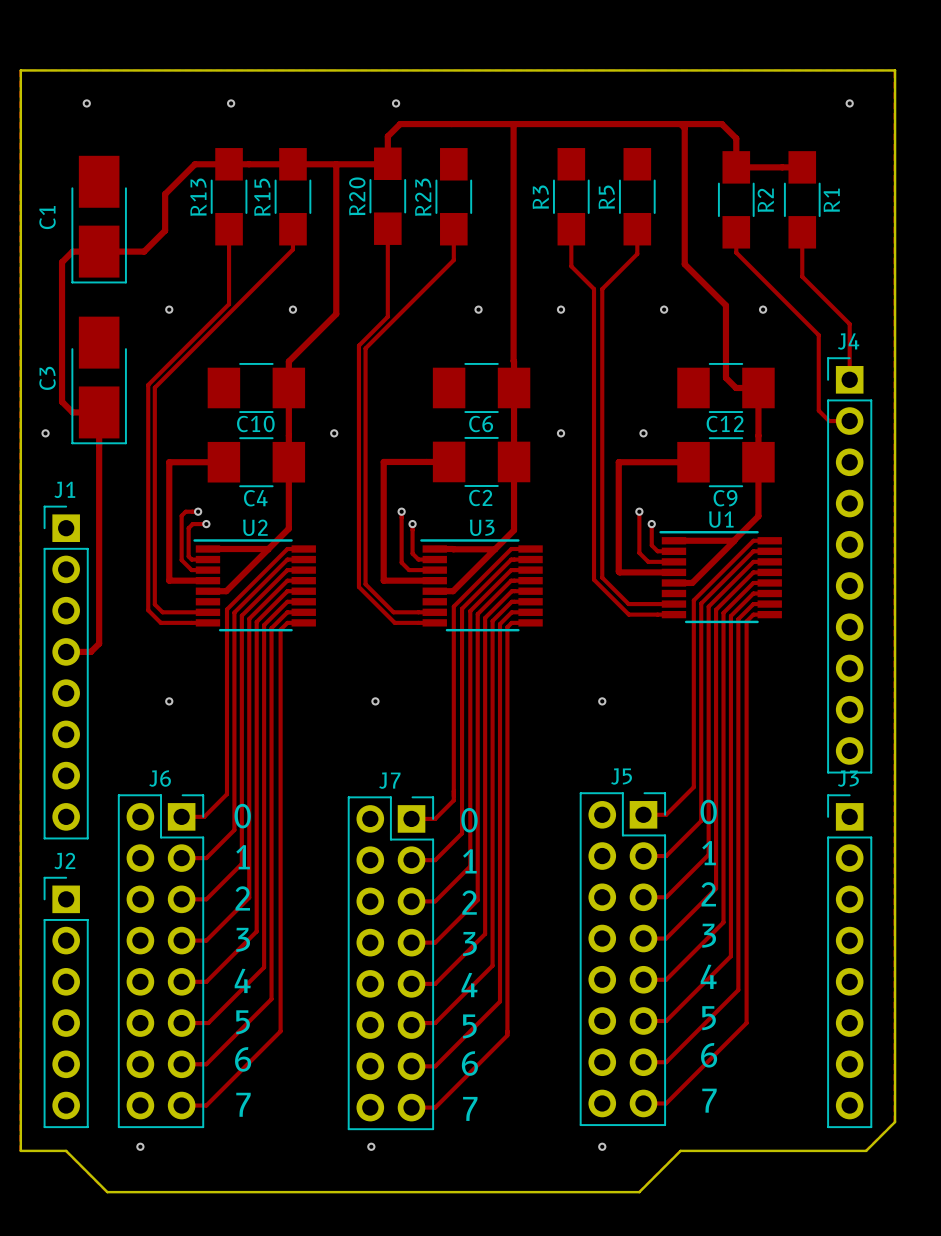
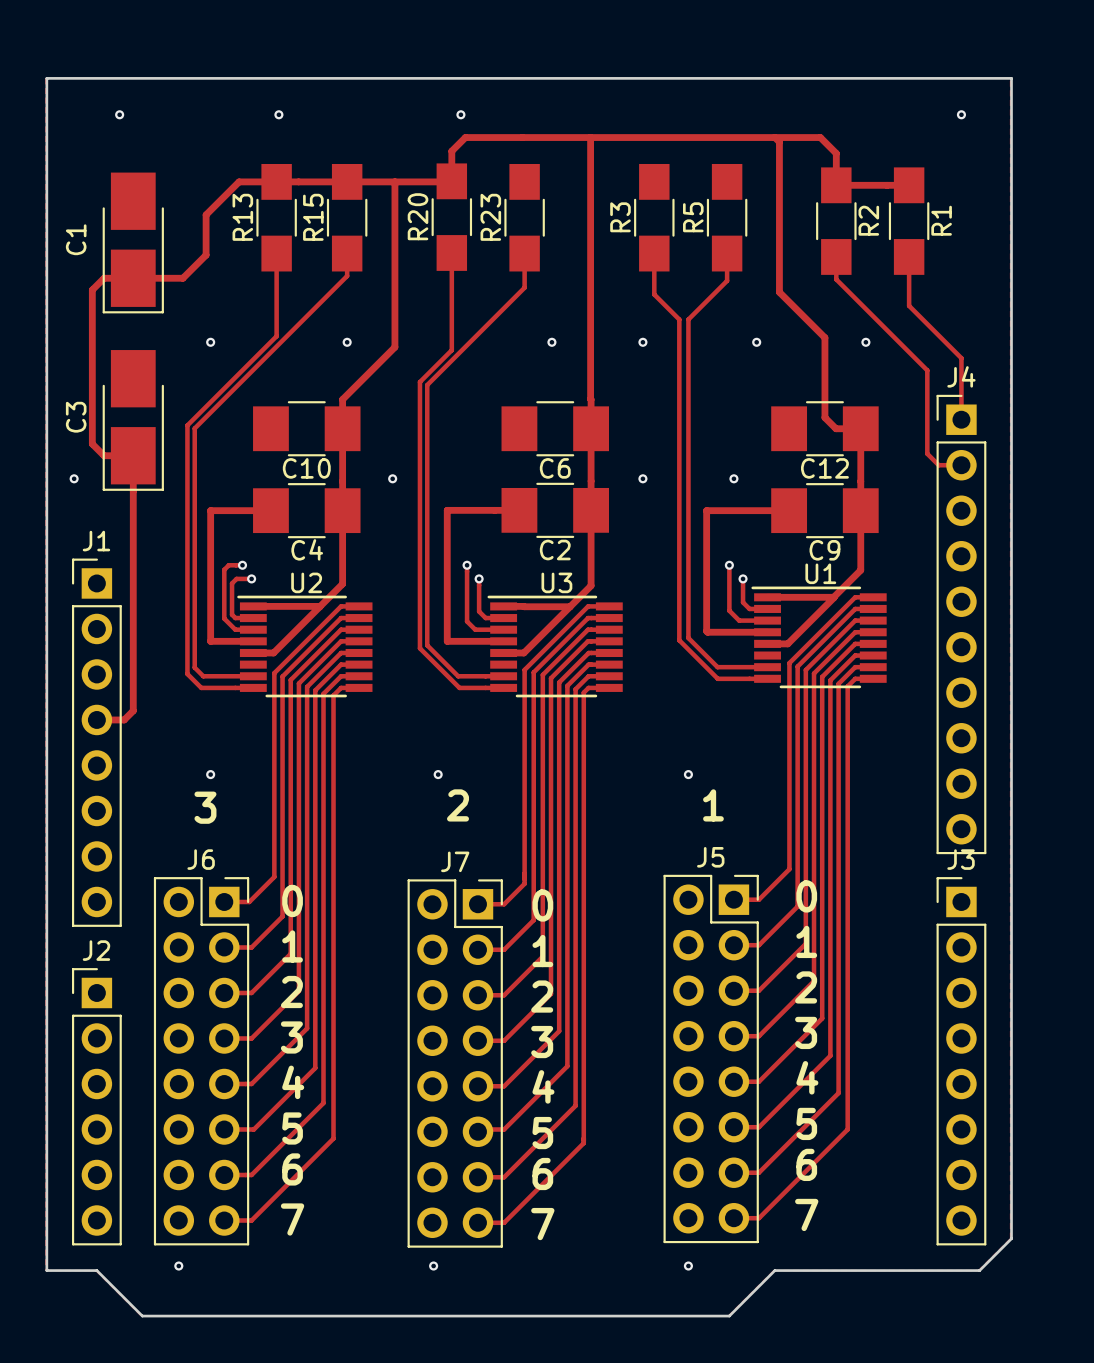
text: none -> 2 (458, 805)
text: none -> 1 (713, 805)
text: none -> 3 (205, 807)

